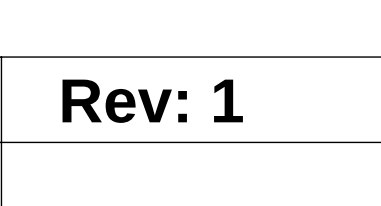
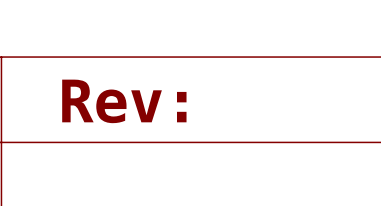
title block: Rev: 1 (152, 101) -> Rev: (124, 101)

